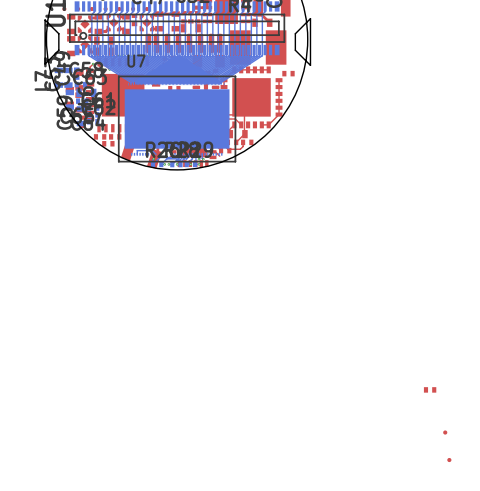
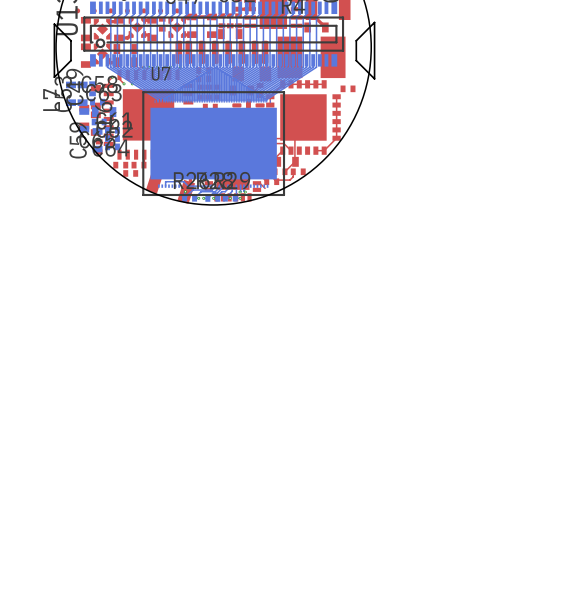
bottom track: none -> (211, 186) (188, 186)
part: (430, 389) -> none
part: (445, 432) -> none
part: (449, 460) -> none

